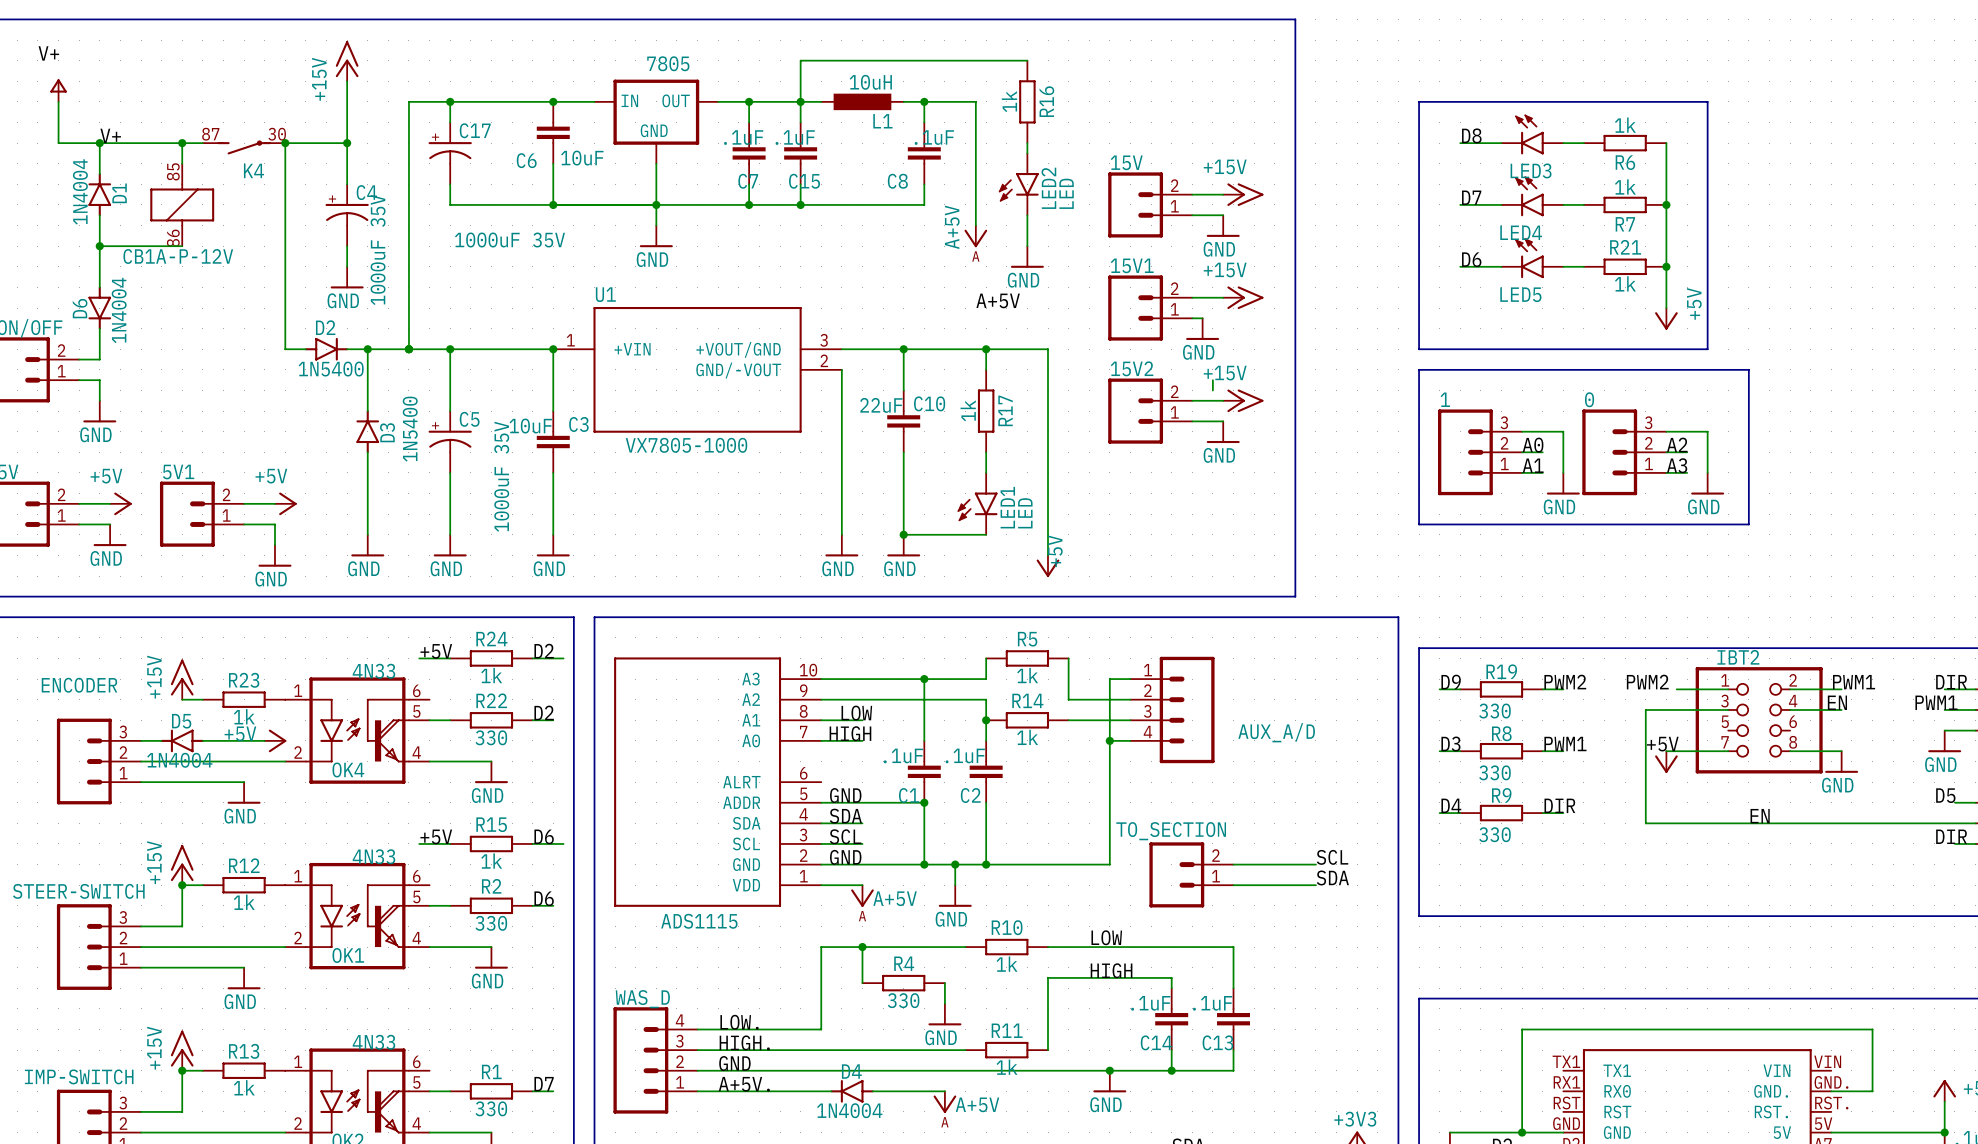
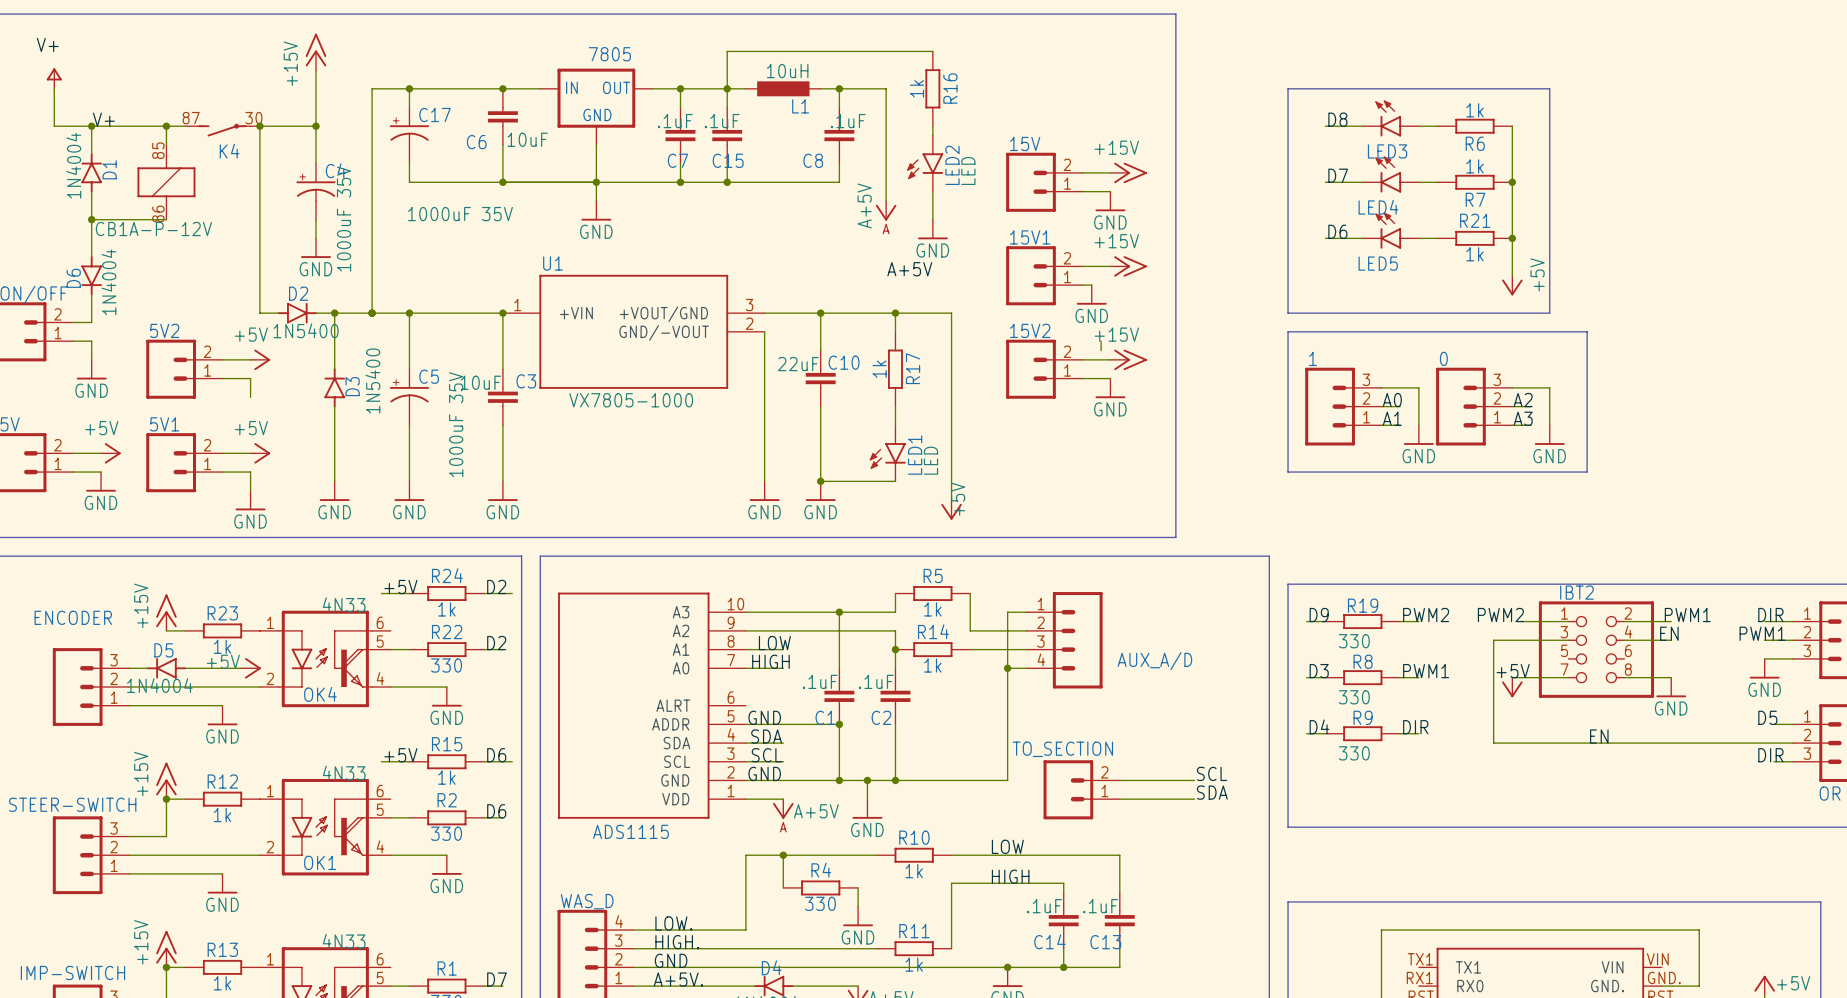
wire: none -> (222, 359) (250, 359)
power symbol: none -> +5V (260, 359)
5V2: none -> (184, 369)
wire: none -> (222, 378) (250, 378) (250, 397)

